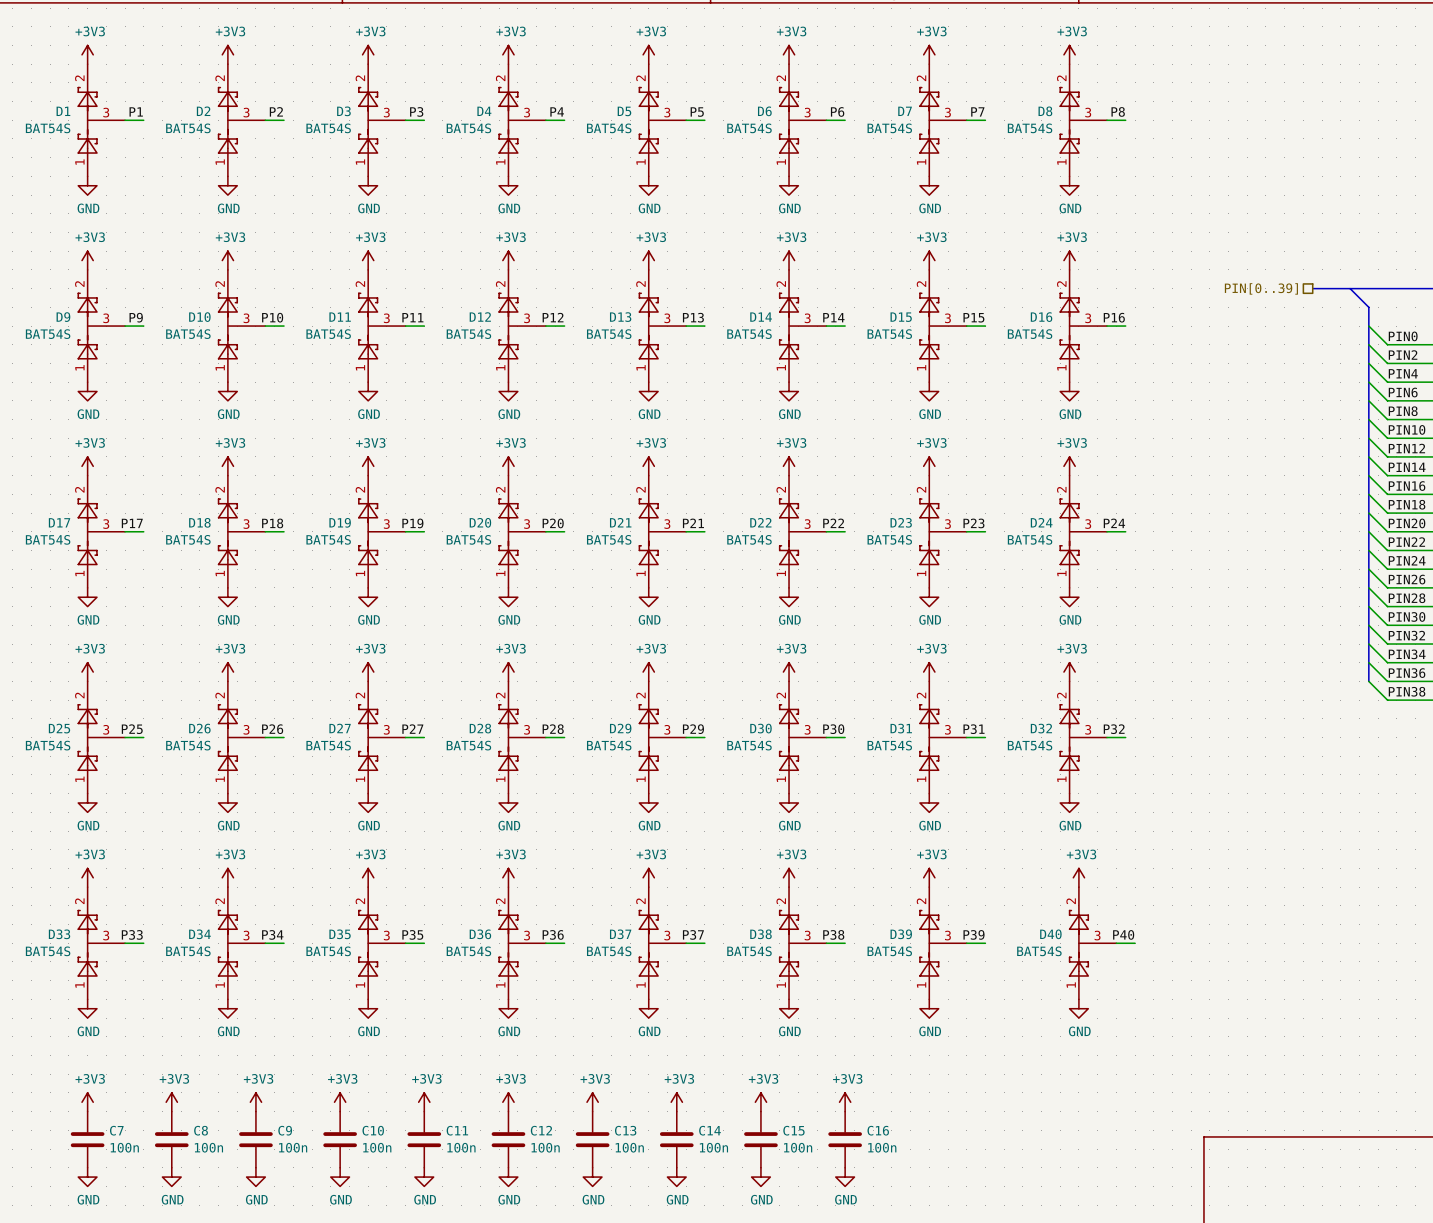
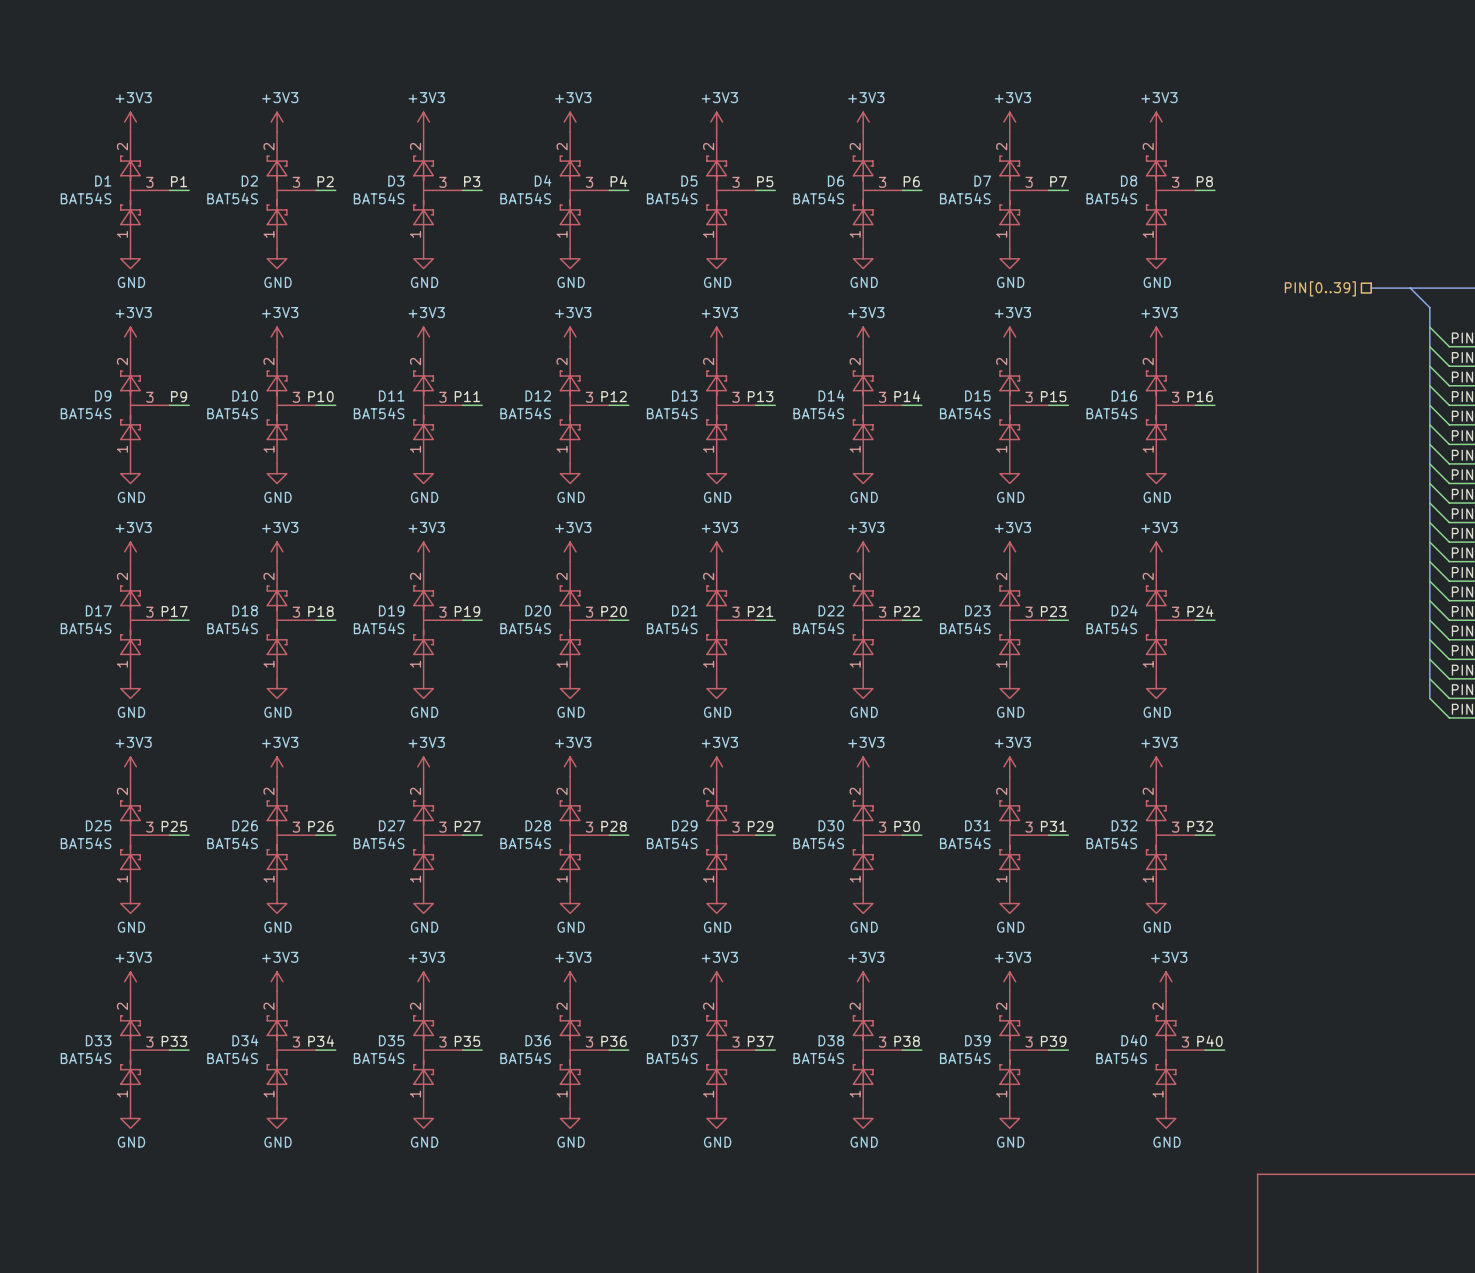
power symbol: +3V3 (87, 54) -> none
power symbol: +3V3 (227, 54) -> none
power symbol: +3V3 (368, 54) -> none
power symbol: +3V3 (508, 54) -> none
power symbol: +3V3 (648, 54) -> none
power symbol: +3V3 (789, 54) -> none
power symbol: +3V3 (929, 54) -> none
power symbol: +3V3 (1069, 54) -> none
label position: P1 (136, 111) -> P1 (179, 181)
label position: P2 (276, 111) -> P2 (325, 181)
label position: P3 (416, 111) -> P3 (472, 181)
label position: P4 (557, 111) -> P4 (618, 181)
label position: P6 (837, 111) -> P6 (911, 181)
label position: P7 (977, 111) -> P7 (1058, 181)
label position: P8 (1118, 111) -> P8 (1204, 181)
label position: P5 (697, 112) -> P5 (765, 181)
D1 position: (101, 120) -> (145, 190)
wire: (125, 120) (143, 120) -> (169, 190) (189, 190)
D2 position: (241, 120) -> (291, 190)
wire: (265, 120) (284, 120) -> (316, 190) (335, 190)
D3 position: (382, 120) -> (438, 190)
wire: (405, 120) (424, 120) -> (462, 190) (482, 190)
D4 position: (522, 120) -> (584, 190)
wire: (545, 120) (564, 120) -> (609, 190) (628, 190)
D5 position: (662, 120) -> (731, 190)
wire: (686, 120) (704, 120) -> (755, 190) (775, 190)
D6 position: (803, 120) -> (877, 190)
wire: (826, 120) (845, 120) -> (902, 190) (921, 190)
D7 position: (943, 120) -> (1024, 190)
wire: (966, 120) (985, 120) -> (1048, 190) (1068, 190)
D8 position: (1083, 120) -> (1170, 190)
wire: (1106, 120) (1125, 120) -> (1195, 190) (1214, 190)
power symbol: none -> +3V3 (130, 122)
power symbol: none -> +3V3 (277, 122)
power symbol: none -> +3V3 (423, 122)
power symbol: none -> +3V3 (570, 122)
power symbol: none -> +3V3 (716, 122)
power symbol: none -> +3V3 (863, 122)
power symbol: none -> +3V3 (1009, 122)
power symbol: none -> +3V3 (1156, 122)
power symbol: GND (87, 185) -> none
power symbol: GND (227, 185) -> none
power symbol: GND (368, 185) -> none
power symbol: GND (508, 185) -> none
power symbol: GND (648, 185) -> none
power symbol: GND (789, 185) -> none
power symbol: GND (929, 185) -> none
power symbol: GND (1069, 185) -> none
power symbol: +3V3 (87, 260) -> none
power symbol: none -> GND (130, 258)
power symbol: +3V3 (227, 260) -> none
power symbol: none -> GND (277, 258)
power symbol: +3V3 (368, 260) -> none
power symbol: none -> GND (423, 258)
power symbol: +3V3 (508, 260) -> none
power symbol: none -> GND (570, 258)
power symbol: +3V3 (648, 260) -> none
power symbol: none -> GND (716, 258)
power symbol: +3V3 (789, 260) -> none
power symbol: none -> GND (863, 258)
power symbol: +3V3 (929, 260) -> none
power symbol: none -> GND (1009, 258)
power symbol: +3V3 (1069, 260) -> none
power symbol: none -> GND (1156, 258)
label position: P9 (136, 317) -> P9 (179, 396)
label position: P10 (272, 317) -> P10 (320, 396)
label position: P11 (412, 317) -> P11 (467, 396)
label position: P12 (553, 317) -> P12 (614, 396)
label position: P13 (693, 317) -> P13 (760, 396)
label position: P14 (833, 317) -> P14 (907, 396)
label position: P15 (973, 317) -> P15 (1053, 396)
label position: P16 (1114, 317) -> P16 (1200, 396)
D9 position: (101, 326) -> (145, 405)
wire: (125, 326) (143, 326) -> (169, 405) (189, 405)
D10 position: (241, 326) -> (291, 405)
wire: (265, 326) (284, 326) -> (316, 405) (335, 405)
D11 position: (382, 326) -> (438, 405)
wire: (405, 326) (424, 326) -> (462, 405) (482, 405)
D12 position: (522, 326) -> (584, 405)
wire: (545, 326) (564, 326) -> (609, 405) (628, 405)
D13 position: (662, 326) -> (731, 405)
wire: (686, 326) (704, 326) -> (755, 405) (775, 405)
D14 position: (803, 326) -> (877, 405)
wire: (826, 326) (845, 326) -> (902, 405) (921, 405)
D15 position: (943, 326) -> (1024, 405)
wire: (966, 326) (985, 326) -> (1048, 405) (1068, 405)
D16 position: (1083, 326) -> (1170, 405)
wire: (1106, 326) (1125, 326) -> (1195, 405) (1214, 405)
power symbol: none -> +3V3 (130, 336)
power symbol: none -> +3V3 (277, 336)
power symbol: none -> +3V3 (423, 336)
power symbol: none -> +3V3 (570, 336)
power symbol: none -> +3V3 (716, 336)
power symbol: none -> +3V3 (863, 336)
power symbol: none -> +3V3 (1009, 336)
power symbol: none -> +3V3 (1156, 336)
power symbol: GND (87, 391) -> none
power symbol: GND (227, 391) -> none
power symbol: GND (368, 391) -> none
power symbol: GND (508, 391) -> none
power symbol: GND (648, 391) -> none
power symbol: GND (789, 391) -> none
power symbol: GND (929, 391) -> none
power symbol: GND (1069, 391) -> none
power symbol: +3V3 (87, 466) -> none
power symbol: none -> GND (130, 473)
power symbol: +3V3 (227, 466) -> none
power symbol: none -> GND (277, 473)
power symbol: +3V3 (368, 466) -> none
power symbol: none -> GND (423, 473)
power symbol: +3V3 (508, 466) -> none
power symbol: none -> GND (570, 473)
power symbol: +3V3 (648, 466) -> none
power symbol: none -> GND (716, 473)
power symbol: +3V3 (789, 466) -> none
power symbol: none -> GND (863, 473)
power symbol: +3V3 (929, 466) -> none
power symbol: none -> GND (1009, 473)
power symbol: +3V3 (1069, 466) -> none
power symbol: none -> GND (1156, 473)
label position: P17 (132, 523) -> P17 (174, 611)
label position: P18 (272, 523) -> P18 (320, 611)
label position: P19 (412, 523) -> P19 (467, 611)
label position: P20 (553, 523) -> P20 (614, 611)
label position: P21 (693, 523) -> P21 (760, 611)
label position: P22 (833, 523) -> P22 (907, 611)
label position: P23 (973, 523) -> P23 (1053, 611)
label position: P24 (1114, 523) -> P24 (1200, 611)
D17 position: (101, 531) -> (145, 620)
wire: (125, 531) (143, 531) -> (169, 620) (189, 620)
D18 position: (241, 531) -> (291, 620)
wire: (265, 531) (284, 531) -> (316, 620) (335, 620)
D19 position: (382, 531) -> (438, 620)
wire: (405, 531) (424, 531) -> (462, 620) (482, 620)
D20 position: (522, 531) -> (584, 620)
wire: (545, 531) (564, 531) -> (609, 620) (628, 620)
D21 position: (662, 531) -> (731, 620)
wire: (686, 531) (704, 531) -> (755, 620) (775, 620)
D22 position: (803, 531) -> (877, 620)
wire: (826, 531) (845, 531) -> (902, 620) (921, 620)
D23 position: (943, 531) -> (1024, 620)
wire: (966, 531) (985, 531) -> (1048, 620) (1068, 620)
D24 position: (1083, 531) -> (1170, 620)
wire: (1106, 531) (1125, 531) -> (1195, 620) (1214, 620)
power symbol: none -> +3V3 (130, 551)
power symbol: none -> +3V3 (277, 551)
power symbol: none -> +3V3 (423, 551)
power symbol: none -> +3V3 (570, 551)
power symbol: none -> +3V3 (716, 551)
power symbol: none -> +3V3 (863, 551)
power symbol: none -> +3V3 (1009, 551)
power symbol: none -> +3V3 (1156, 551)
power symbol: GND (87, 597) -> none
power symbol: GND (227, 597) -> none
power symbol: GND (368, 597) -> none
power symbol: GND (508, 597) -> none
power symbol: GND (648, 597) -> none
power symbol: GND (789, 597) -> none
power symbol: GND (929, 597) -> none
power symbol: GND (1069, 597) -> none
power symbol: +3V3 (87, 672) -> none
power symbol: none -> GND (130, 688)
power symbol: +3V3 (227, 672) -> none
power symbol: none -> GND (277, 688)
power symbol: +3V3 (368, 672) -> none
power symbol: none -> GND (423, 688)
power symbol: +3V3 (508, 672) -> none
power symbol: none -> GND (570, 688)
power symbol: +3V3 (648, 672) -> none
power symbol: none -> GND (716, 688)
power symbol: +3V3 (789, 672) -> none
power symbol: none -> GND (863, 688)
power symbol: +3V3 (929, 672) -> none
power symbol: none -> GND (1009, 688)
power symbol: +3V3 (1069, 672) -> none
power symbol: none -> GND (1156, 688)
label position: P25 (132, 729) -> P25 (174, 826)
label position: P26 (272, 729) -> P26 (320, 826)
label position: P27 (412, 729) -> P27 (467, 826)
label position: P28 (553, 729) -> P28 (614, 826)
label position: P29 (693, 729) -> P29 (760, 826)
label position: P30 (833, 729) -> P30 (907, 826)
label position: P31 (974, 729) -> P31 (1053, 826)
label position: P32 (1114, 729) -> P32 (1200, 826)
D25 position: (101, 737) -> (145, 835)
wire: (125, 737) (143, 737) -> (169, 835) (189, 835)
D26 position: (241, 737) -> (291, 835)
wire: (265, 737) (284, 737) -> (316, 835) (335, 835)
D27 position: (382, 737) -> (438, 835)
wire: (405, 737) (424, 737) -> (462, 835) (482, 835)
D28 position: (522, 737) -> (584, 835)
wire: (545, 737) (564, 737) -> (609, 835) (628, 835)
D29 position: (662, 737) -> (731, 835)
wire: (686, 737) (704, 737) -> (755, 835) (775, 835)
D30 position: (803, 737) -> (877, 835)
wire: (826, 737) (845, 737) -> (902, 835) (921, 835)
D31 position: (943, 737) -> (1024, 835)
wire: (966, 737) (985, 737) -> (1048, 835) (1068, 835)
D32 position: (1083, 737) -> (1170, 835)
wire: (1106, 737) (1125, 737) -> (1195, 835) (1214, 835)
power symbol: none -> +3V3 (130, 766)
power symbol: none -> +3V3 (277, 766)
power symbol: none -> +3V3 (423, 766)
power symbol: none -> +3V3 (570, 766)
power symbol: none -> +3V3 (716, 766)
power symbol: none -> +3V3 (863, 766)
power symbol: none -> +3V3 (1009, 766)
power symbol: none -> +3V3 (1156, 766)
power symbol: GND (87, 802) -> none
power symbol: GND (227, 802) -> none
power symbol: GND (368, 802) -> none
power symbol: GND (508, 802) -> none
power symbol: GND (648, 802) -> none
power symbol: GND (789, 802) -> none
power symbol: GND (929, 802) -> none
power symbol: GND (1069, 802) -> none
power symbol: +3V3 (87, 877) -> none
power symbol: none -> GND (130, 903)
power symbol: +3V3 (227, 877) -> none
power symbol: none -> GND (277, 903)
power symbol: +3V3 (368, 877) -> none
power symbol: none -> GND (423, 903)
power symbol: +3V3 (508, 877) -> none
power symbol: none -> GND (570, 903)
power symbol: +3V3 (648, 877) -> none
power symbol: none -> GND (716, 903)
power symbol: +3V3 (789, 877) -> none
power symbol: none -> GND (863, 903)
power symbol: +3V3 (929, 877) -> none
power symbol: none -> GND (1009, 903)
power symbol: +3V3 (1078, 877) -> none
power symbol: none -> GND (1156, 903)
label position: P33 (132, 934) -> P33 (174, 1041)
label position: P34 (272, 934) -> P34 (321, 1041)
label position: P35 (412, 934) -> P35 (467, 1041)
label position: P36 (553, 934) -> P36 (614, 1041)
label position: P37 (693, 934) -> P37 (760, 1041)
label position: P38 (833, 934) -> P38 (907, 1041)
label position: P39 (974, 934) -> P39 (1053, 1041)
label position: P40 (1123, 934) -> P40 (1209, 1041)
D33 position: (101, 943) -> (145, 1050)
wire: (125, 943) (143, 943) -> (169, 1050) (189, 1050)
D34 position: (241, 943) -> (291, 1050)
wire: (265, 943) (284, 943) -> (316, 1050) (335, 1050)
D35 position: (382, 943) -> (438, 1050)
wire: (405, 943) (424, 943) -> (462, 1050) (482, 1050)
D36 position: (522, 943) -> (584, 1050)
wire: (545, 943) (564, 943) -> (609, 1050) (628, 1050)
D37 position: (662, 943) -> (731, 1050)
wire: (686, 943) (704, 943) -> (755, 1050) (775, 1050)
D38 position: (803, 943) -> (877, 1050)
wire: (826, 943) (845, 943) -> (902, 1050) (921, 1050)
D39 position: (943, 943) -> (1024, 1050)
wire: (966, 943) (985, 943) -> (1048, 1050) (1068, 1050)
D40 position: (1092, 943) -> (1180, 1050)
wire: (1116, 943) (1135, 943) -> (1205, 1050) (1224, 1050)
power symbol: none -> +3V3 (130, 981)
power symbol: none -> +3V3 (277, 981)
power symbol: none -> +3V3 (423, 981)
power symbol: none -> +3V3 (570, 981)
power symbol: none -> +3V3 (716, 981)
power symbol: none -> +3V3 (863, 981)
power symbol: none -> +3V3 (1009, 981)
power symbol: none -> +3V3 (1166, 981)
power symbol: GND (87, 1008) -> none
power symbol: GND (227, 1008) -> none
power symbol: GND (368, 1008) -> none
power symbol: GND (508, 1008) -> none
power symbol: GND (648, 1008) -> none
power symbol: GND (789, 1008) -> none
power symbol: GND (929, 1008) -> none
power symbol: GND (1078, 1008) -> none
power symbol: none -> GND (130, 1118)
power symbol: none -> GND (277, 1118)
power symbol: none -> GND (423, 1118)
power symbol: none -> GND (570, 1118)
power symbol: none -> GND (716, 1118)
power symbol: none -> GND (863, 1118)
power symbol: none -> GND (1009, 1118)
power symbol: none -> GND (1166, 1118)
power symbol: +3V3 (87, 1102) -> none
power symbol: +3V3 (171, 1102) -> none
power symbol: +3V3 (255, 1102) -> none
power symbol: +3V3 (340, 1102) -> none
power symbol: +3V3 (424, 1102) -> none
power symbol: +3V3 (508, 1102) -> none
power symbol: +3V3 (592, 1102) -> none
power symbol: +3V3 (676, 1102) -> none
power symbol: +3V3 (760, 1102) -> none
power symbol: +3V3 (845, 1102) -> none
C7: 100n (87, 1139) -> none
C8: 100n (171, 1139) -> none
C9: 100n (255, 1139) -> none
C10: 100n (340, 1139) -> none
C11: 100n (424, 1139) -> none
C12: 100n (508, 1139) -> none
C13: 100n (592, 1139) -> none
C14: 100n (676, 1139) -> none
C15: 100n (760, 1139) -> none
C16: 100n (845, 1139) -> none
power symbol: GND (87, 1177) -> none
power symbol: GND (171, 1177) -> none
power symbol: GND (255, 1177) -> none
power symbol: GND (340, 1177) -> none
power symbol: GND (424, 1177) -> none
power symbol: GND (508, 1177) -> none
power symbol: GND (592, 1177) -> none
power symbol: GND (676, 1177) -> none
power symbol: GND (760, 1177) -> none
power symbol: GND (845, 1177) -> none

